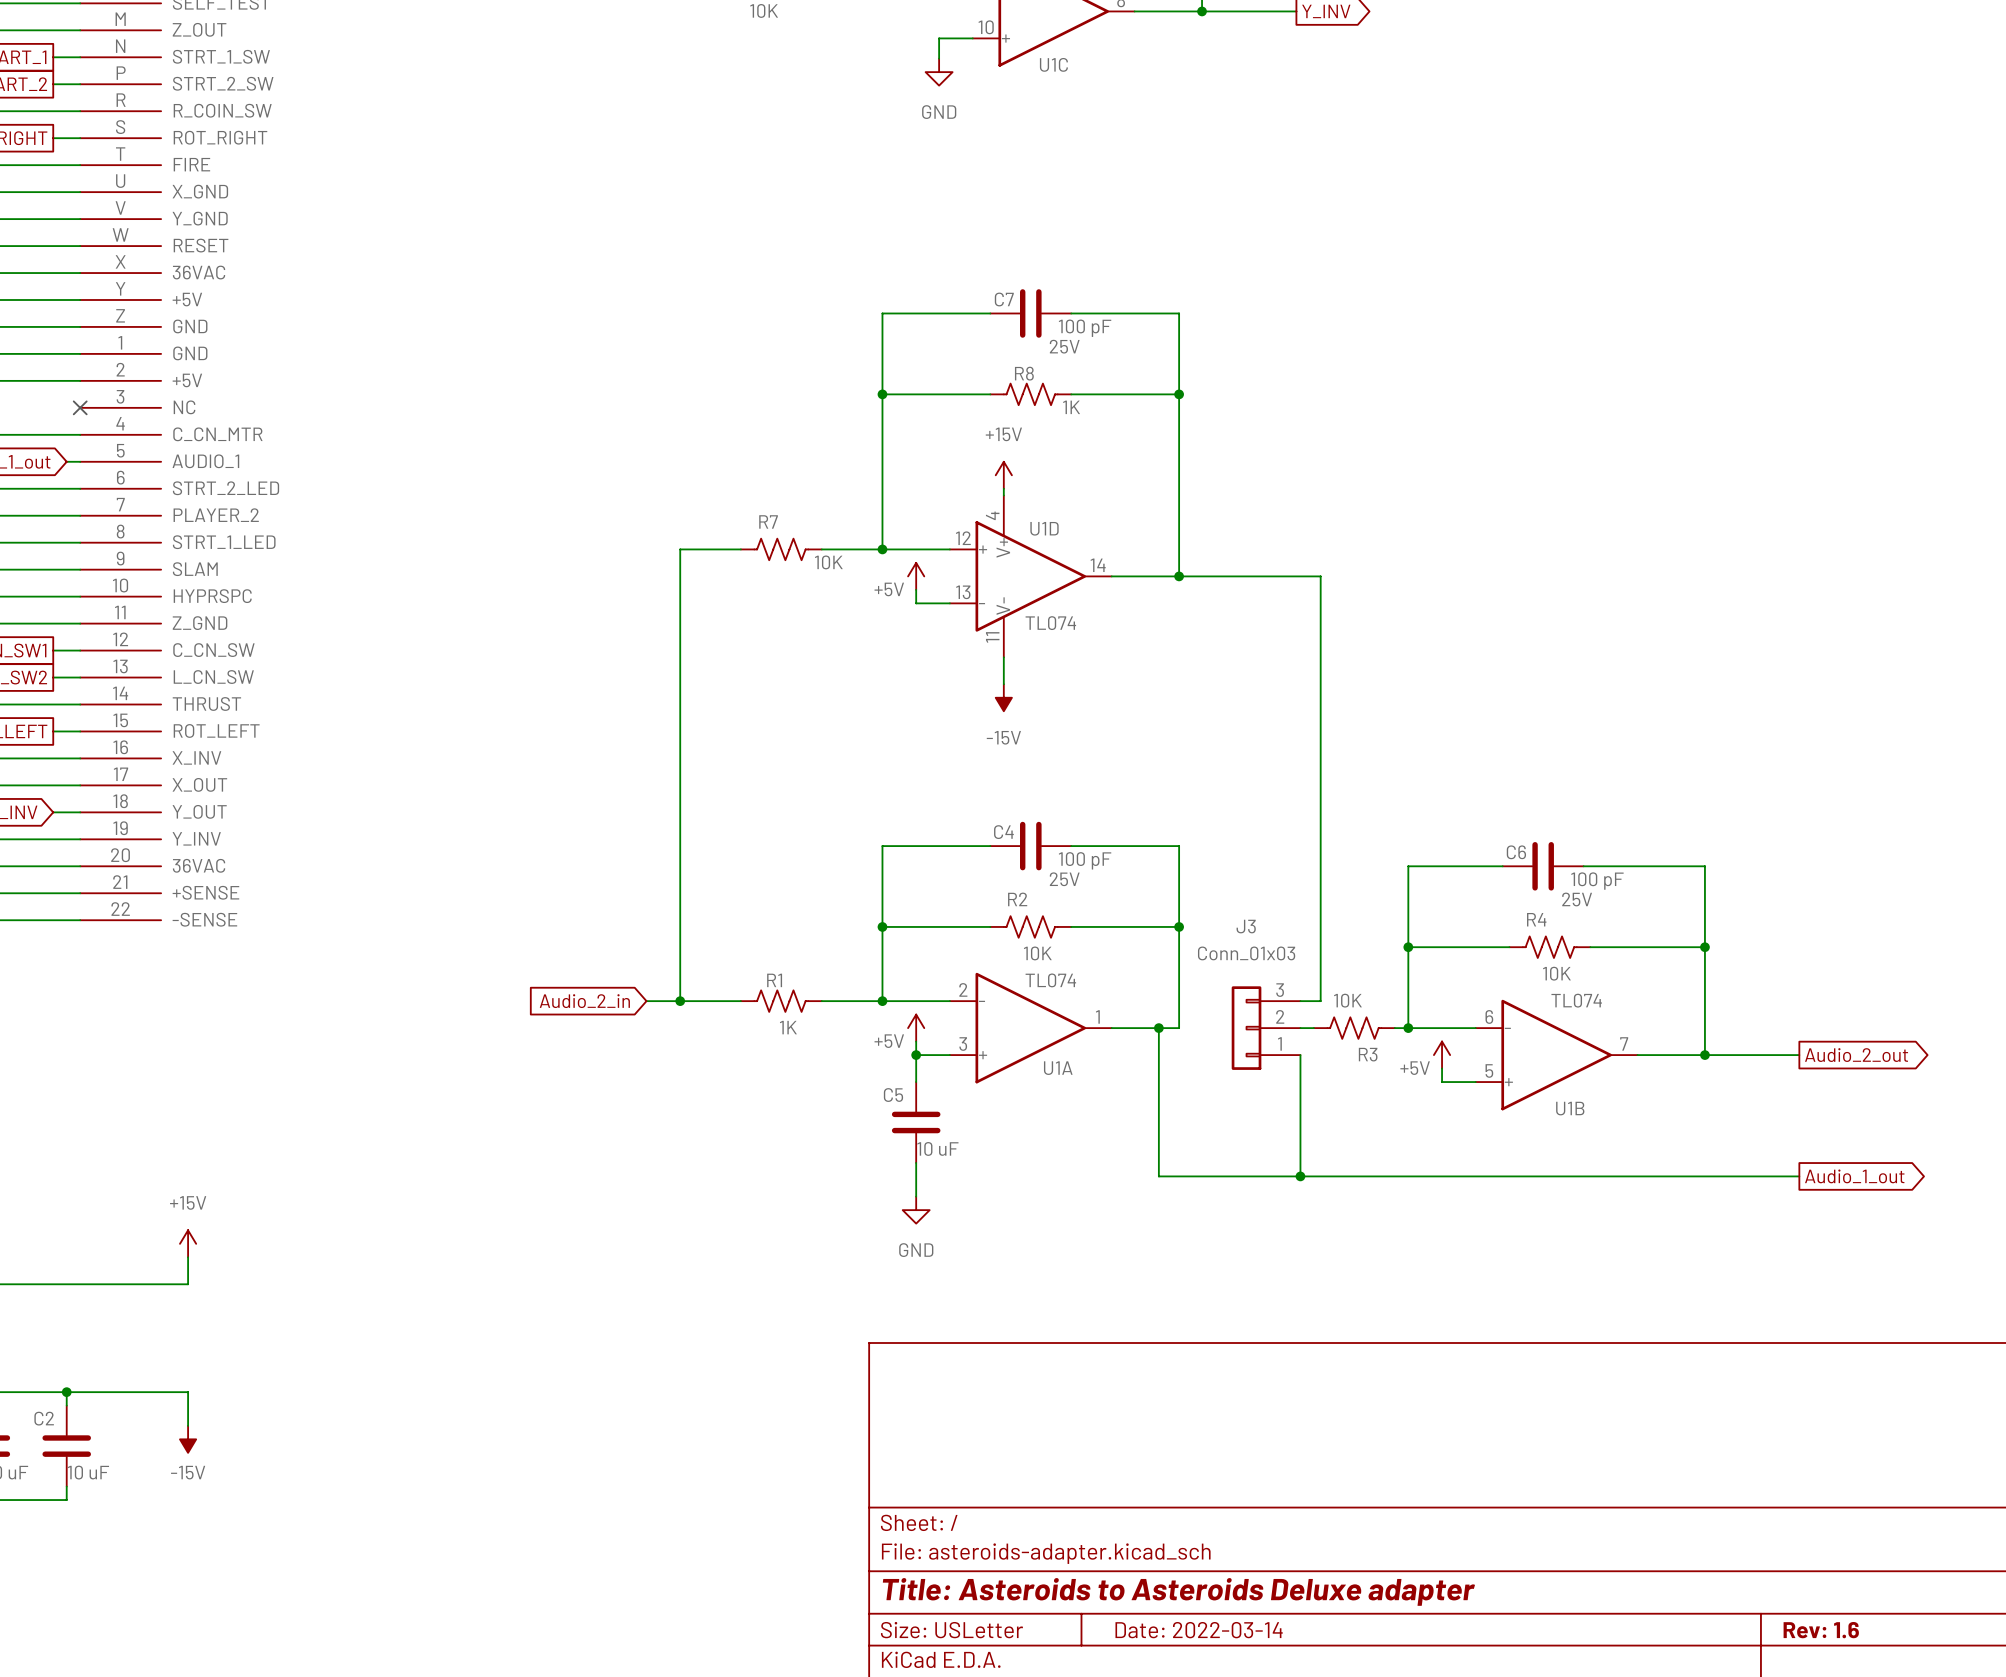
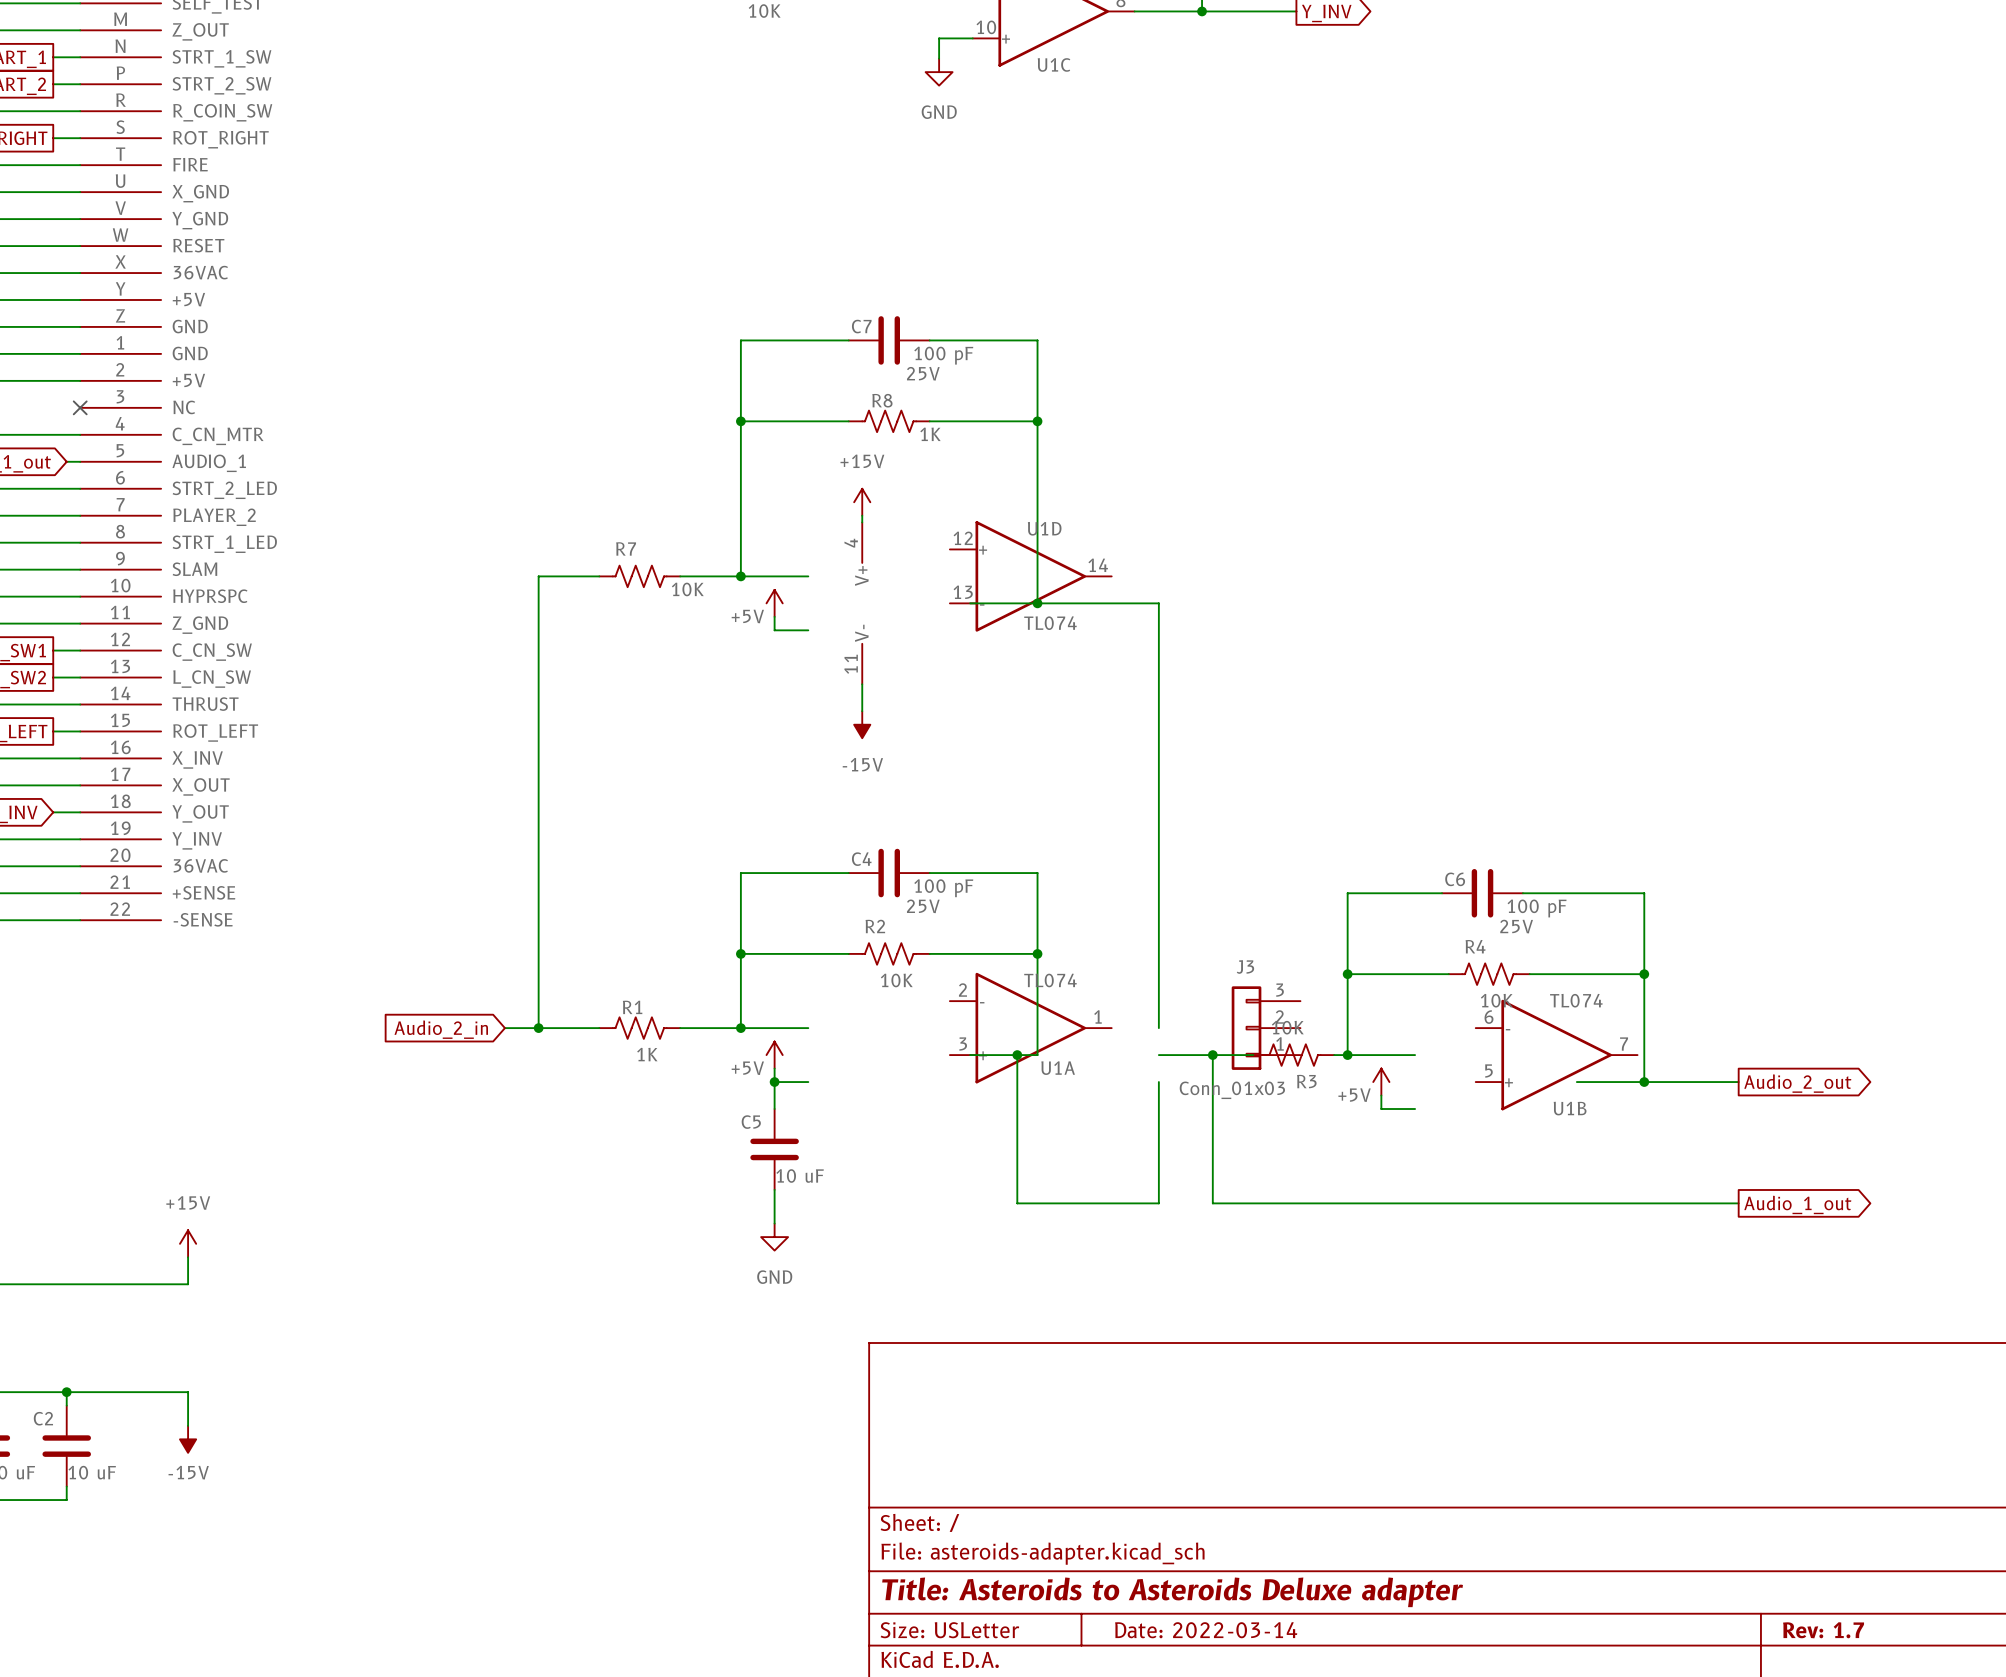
wire: (990, 313) (882, 313) (882, 549) -> (848, 340) (740, 340) (740, 576)
C7 position: (1030, 313) -> (889, 340)
wire: (1071, 313) (1179, 313) (1179, 576) -> (929, 340) (1037, 340) (1037, 603)
wire: (882, 394) (990, 394) -> (740, 421) (848, 421)
junction: (882, 394) -> none
R8 position: (1030, 394) -> (889, 421)
wire: (1071, 394) (1179, 394) -> (929, 421) (1037, 421)
junction: (1179, 394) -> none
junction: none -> (740, 421)
junction: none -> (1037, 421)
power symbol position: +15V (1003, 475) -> +15V (862, 502)
wire: (1003, 488) (1003, 495) -> (862, 515) (862, 522)
wire: (740, 549) (680, 549) (680, 1001) -> (599, 576) (538, 576) (538, 1028)
R7 position: (781, 549) -> (639, 576)
wire: (821, 549) (949, 549) -> (680, 576) (808, 576)
junction: (882, 549) -> none
junction: none -> (740, 576)
power symbol position: +5V (916, 576) -> +5V (774, 603)
part position: (1003, 576) -> (862, 603)
wire: (1111, 576) (1320, 576) (1320, 1001) (1300, 1001) -> none
junction: (1179, 576) -> none
wire: (916, 589) (916, 603) (949, 603) -> (774, 616) (774, 630) (808, 630)
junction: none -> (1037, 603)
wire: (1003, 657) (1003, 684) -> (862, 684) (862, 711)
power symbol position: -15V (1003, 697) -> -15V (862, 724)
wire: (990, 846) (882, 846) (882, 1001) -> (848, 873) (740, 873) (740, 1028)
C4 position: (1030, 846) -> (889, 873)
wire: (1071, 846) (1179, 846) (1179, 1028) (1111, 1028) -> (929, 873) (1037, 873) (1037, 1055) (970, 1055)
wire: (1502, 866) (1408, 866) (1408, 1028) -> (1442, 893) (1347, 893) (1347, 1055)
C6 position: (1543, 866) -> (1482, 893)
wire: (1583, 866) (1704, 866) (1704, 1055) -> (1522, 893) (1644, 893) (1644, 1082)
wire: (882, 926) (990, 926) -> (740, 953) (848, 953)
junction: (882, 926) -> none
R2 position: (1030, 926) -> (889, 953)
wire: (1071, 926) (1179, 926) -> (929, 953) (1037, 953)
junction: (1179, 926) -> none
J3 name position: J3 (1246, 926) -> J3 (1245, 966)
wire: (1408, 947) (1509, 947) -> (1347, 974) (1448, 974)
junction: (1408, 947) -> none
R4 position: (1549, 947) -> (1489, 974)
wire: (1590, 947) (1704, 947) -> (1529, 974) (1644, 974)
junction: (1704, 947) -> none
junction: none -> (740, 953)
junction: none -> (1037, 953)
J3 value position: Conn_01x03 (1246, 953) -> Conn_01x03 (1232, 1090)
junction: none -> (1347, 974)
junction: none -> (1644, 974)
global label position: Audio_2_in (584, 1001) -> Audio_2_in (441, 1029)
wire: (646, 1001) (740, 1001) -> (504, 1028) (599, 1028)
junction: (680, 1001) -> none
R1 position: (781, 1001) -> (639, 1028)
wire: (821, 1001) (949, 1001) -> (680, 1028) (808, 1028)
junction: (882, 1001) -> none
junction: none -> (538, 1028)
junction: none -> (740, 1028)
power symbol position: +5V (916, 1028) -> +5V (774, 1055)
wire: (1158, 1028) (1158, 1082) -> (1158, 1028) (1158, 603) (970, 603)
junction position: (1158, 1028) -> (1212, 1055)
wire: (1300, 1028) (1313, 1028) -> none
R3 position: (1354, 1028) -> (1293, 1055)
wire: (1394, 1028) (1475, 1028) -> (1334, 1055) (1415, 1055)
junction: (1408, 1028) -> none
wire: (916, 1041) (916, 1082) -> (774, 1068) (774, 1109)
wire: (916, 1055) (949, 1055) -> (774, 1082) (808, 1082)
junction: (916, 1055) -> none
junction: none -> (1017, 1055)
wire: none -> (1158, 1055) (1253, 1055)
wire: none -> (1212, 1055) (1212, 1203) (1738, 1203)
wire: (1300, 1055) (1300, 1176) -> none
junction: none -> (1347, 1055)
power symbol position: +5V (1442, 1055) -> +5V (1381, 1082)
wire: (1637, 1055) (1799, 1055) -> (1576, 1082) (1738, 1082)
junction: (1704, 1055) -> none
global label position: Audio_2_out (1856, 1055) -> Audio_2_out (1797, 1083)
wire: (1442, 1068) (1442, 1082) (1475, 1082) -> (1381, 1095) (1381, 1109) (1415, 1109)
junction: none -> (774, 1082)
junction: none -> (1644, 1082)
C5 position: (916, 1122) -> (774, 1149)
wire: (916, 1162) (916, 1196) -> (774, 1189) (774, 1223)
wire: (1158, 1176) (1799, 1176) -> (1158, 1176) (1158, 1203) (1017, 1203) (1017, 1055)
junction: (1300, 1176) -> none
global label position: Audio_1_out (1854, 1176) -> Audio_1_out (1797, 1204)
power symbol position: GND (916, 1210) -> GND (774, 1237)
title block: Rev: 1.6 (1821, 1630) -> Rev: 1.7 (1823, 1630)

